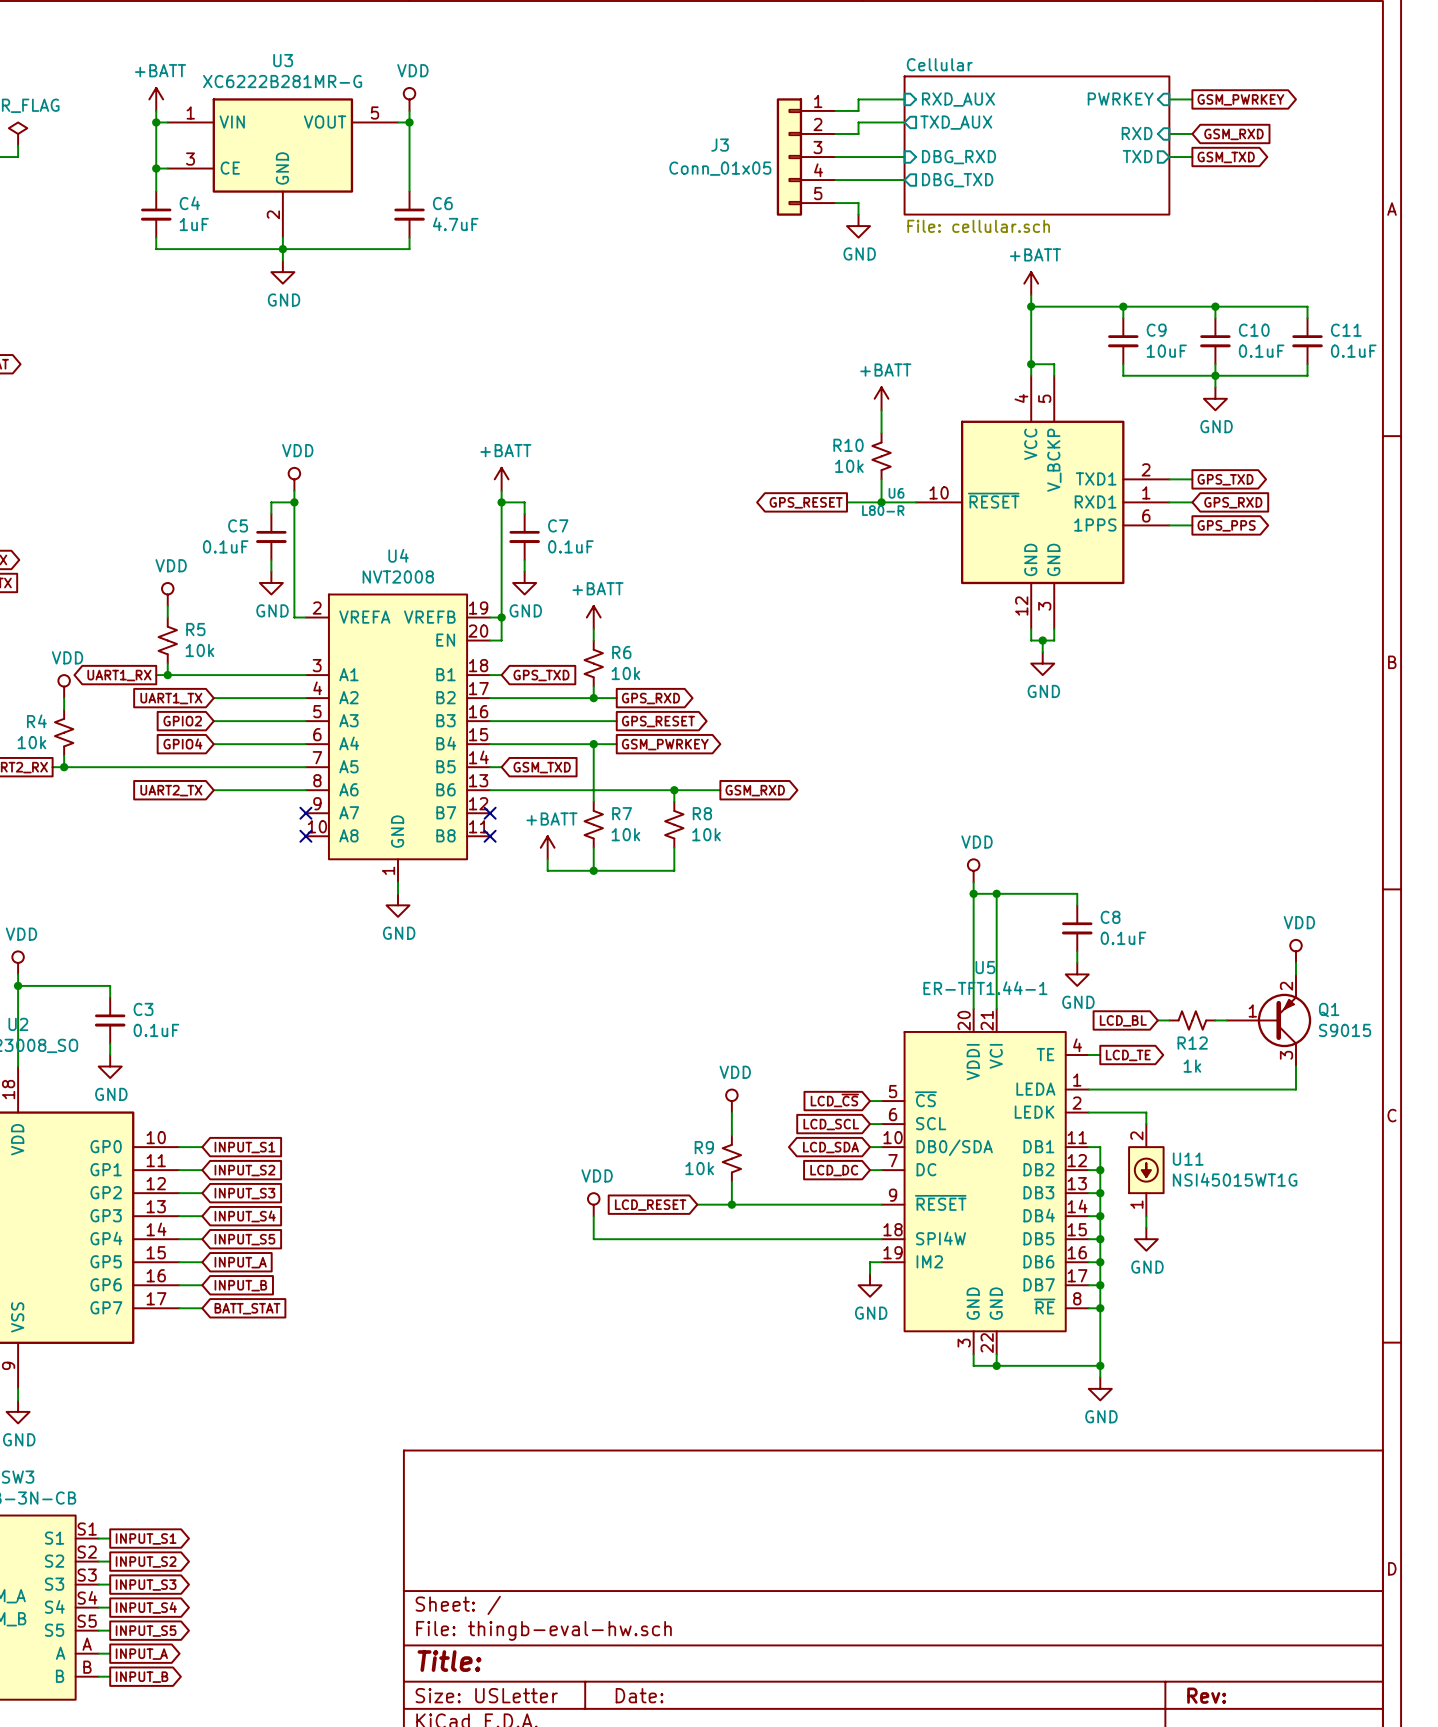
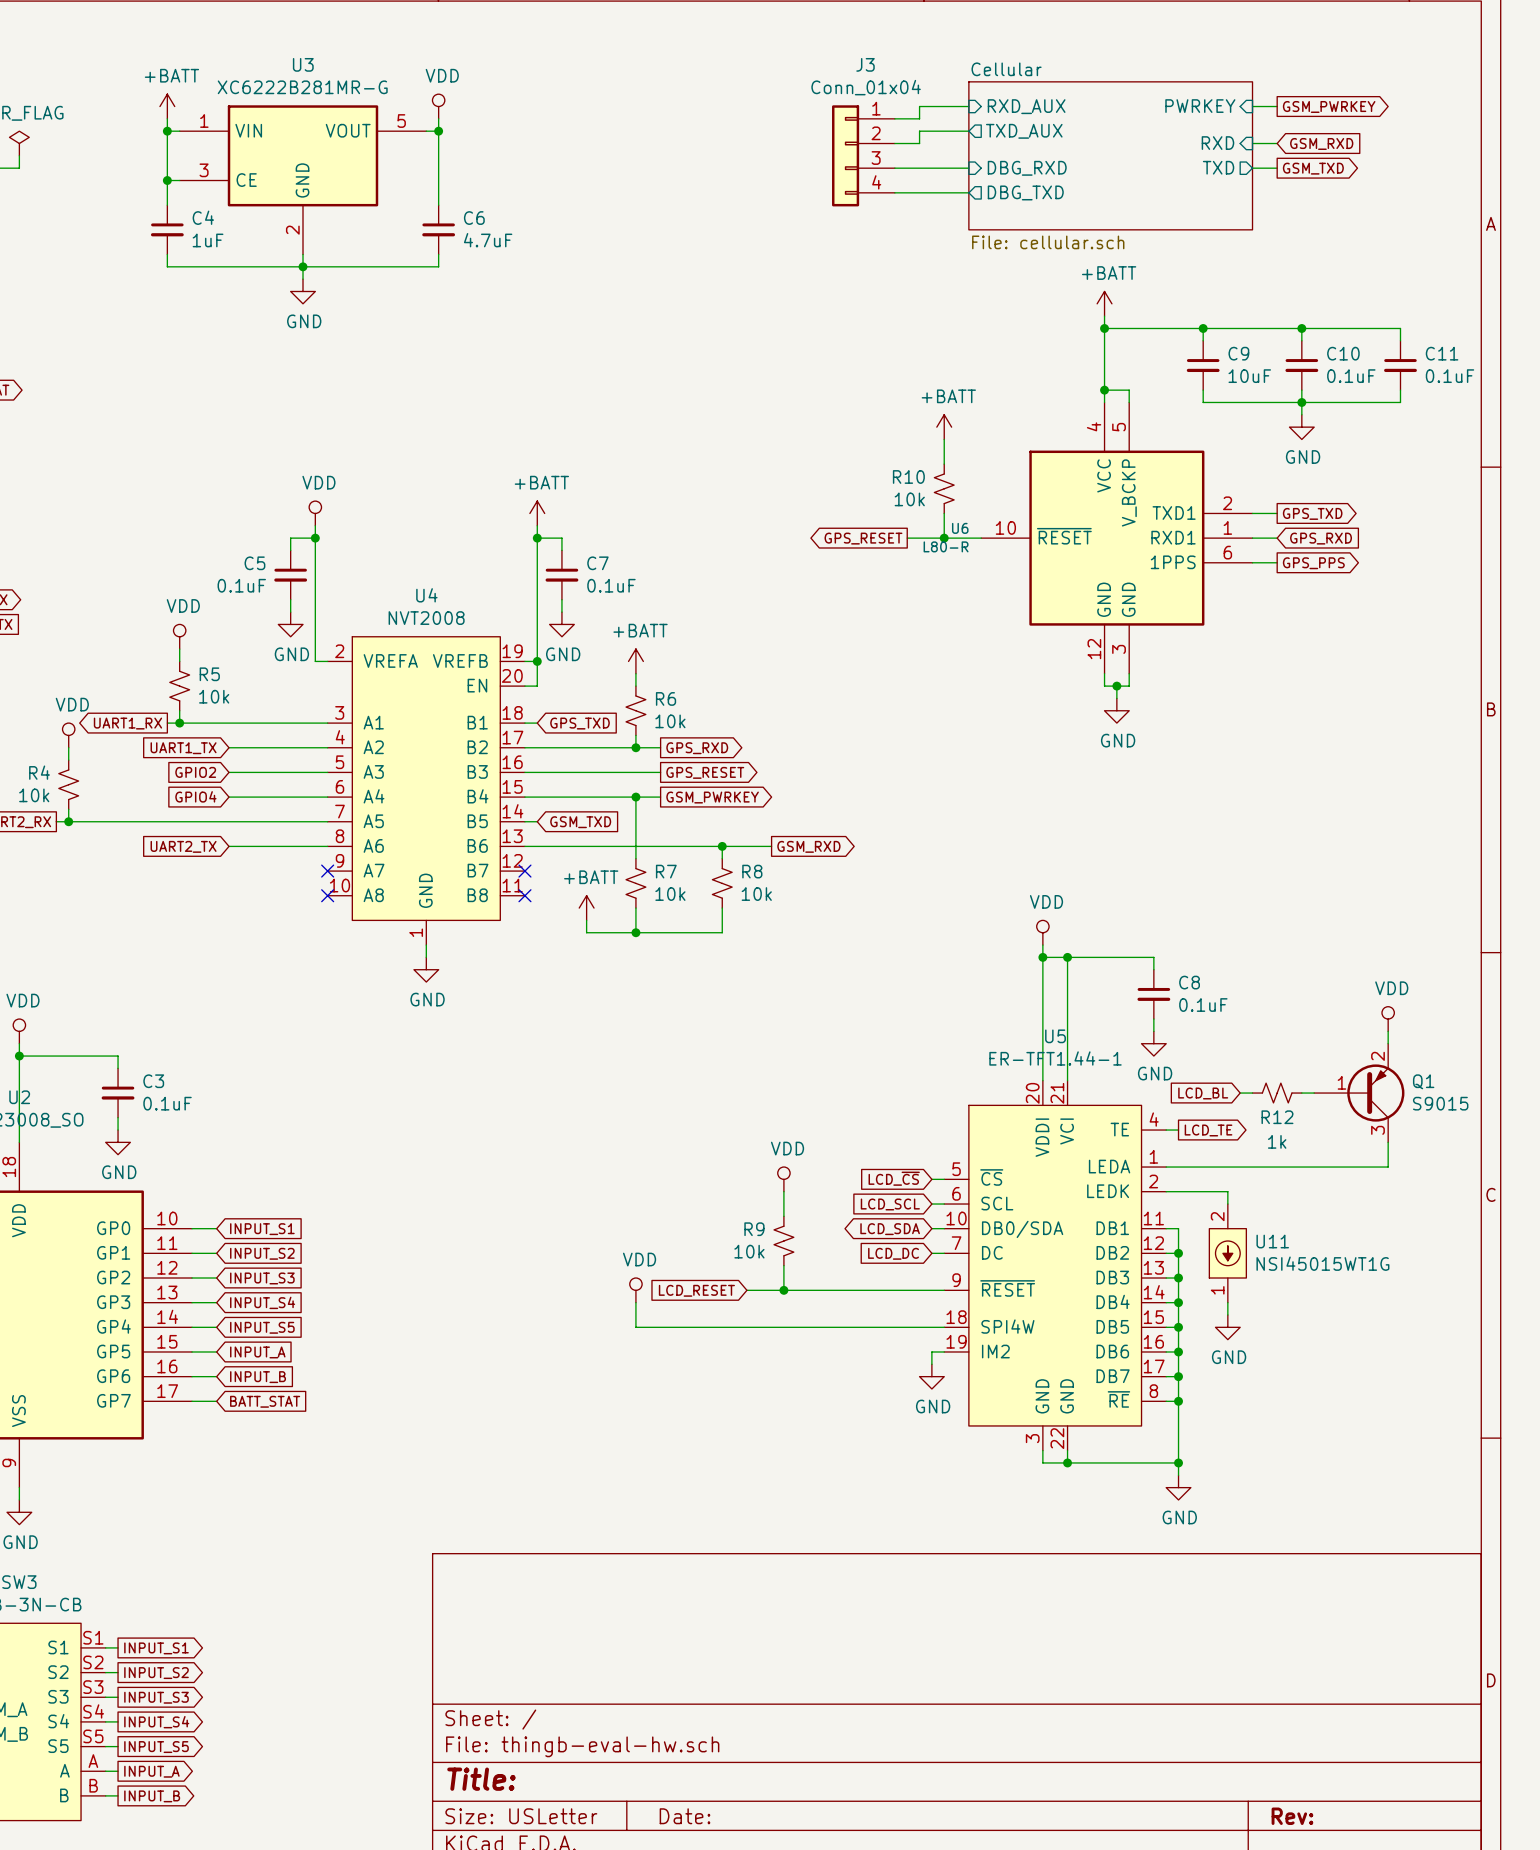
J3 symbol: [776, 98, 836, 216] -> [832, 105, 895, 207]
J3 name position: J3 (720, 145) -> J3 (865, 64)
J3 value: Conn_01x05 (720, 168) -> Conn_01x04 (866, 87)
wire: (835, 203) (858, 203) (858, 214) -> none
power symbol: GND (858, 226) -> none

